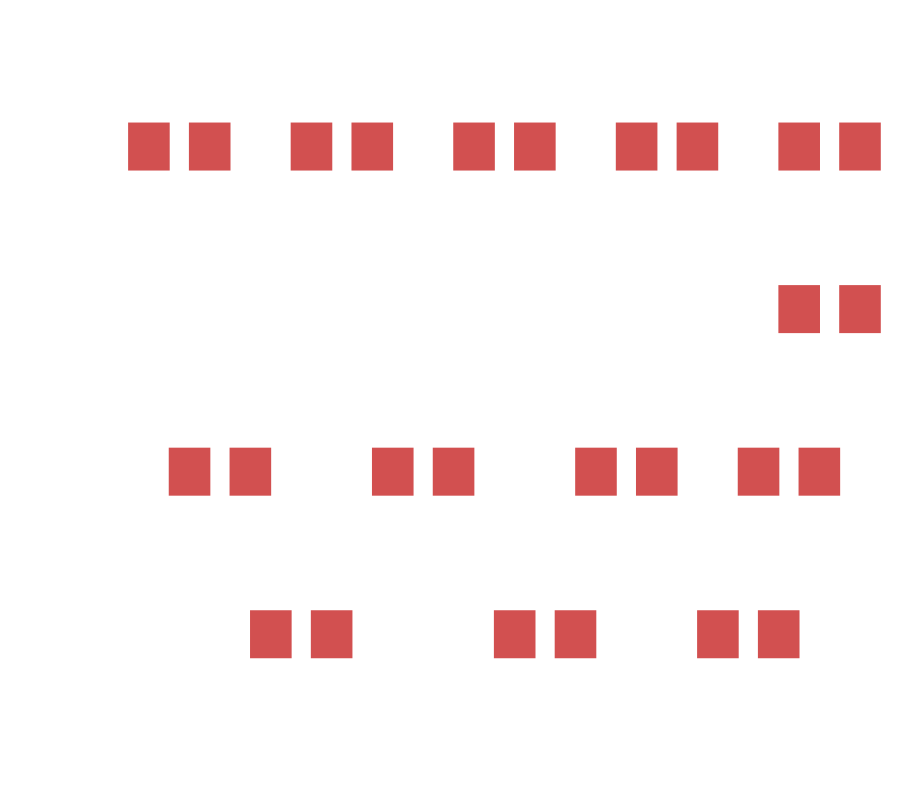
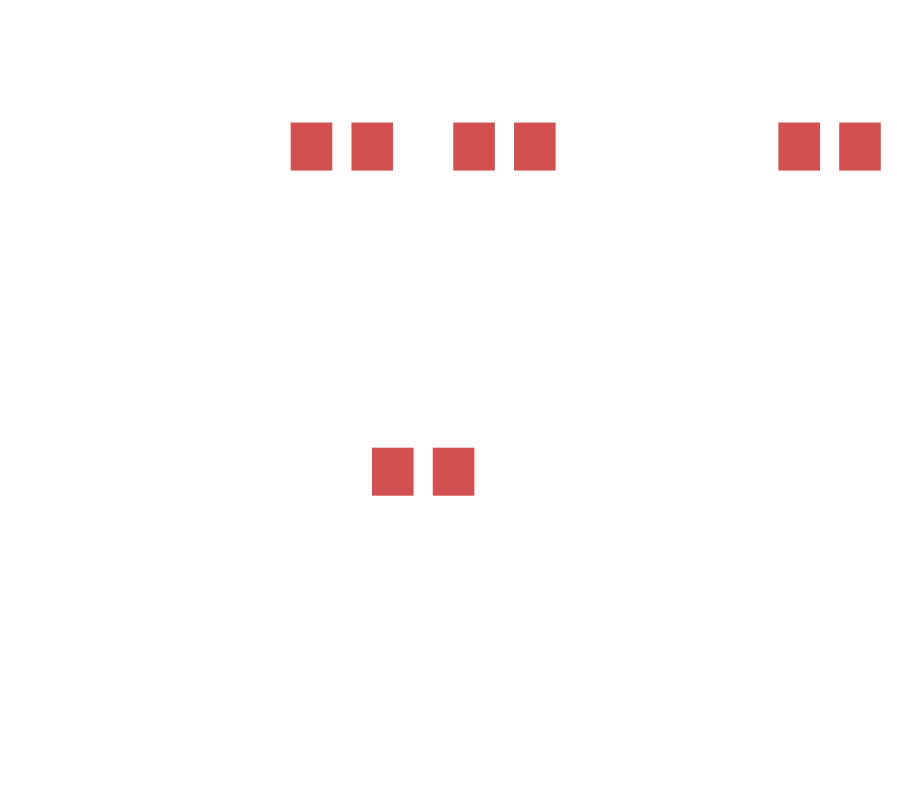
part: (179, 146) -> none
part: (667, 146) -> none
part: (829, 309) -> none
part: (219, 471) -> none
part: (626, 471) -> none
part: (788, 471) -> none
part: (301, 634) -> none
part: (545, 634) -> none
part: (748, 634) -> none

